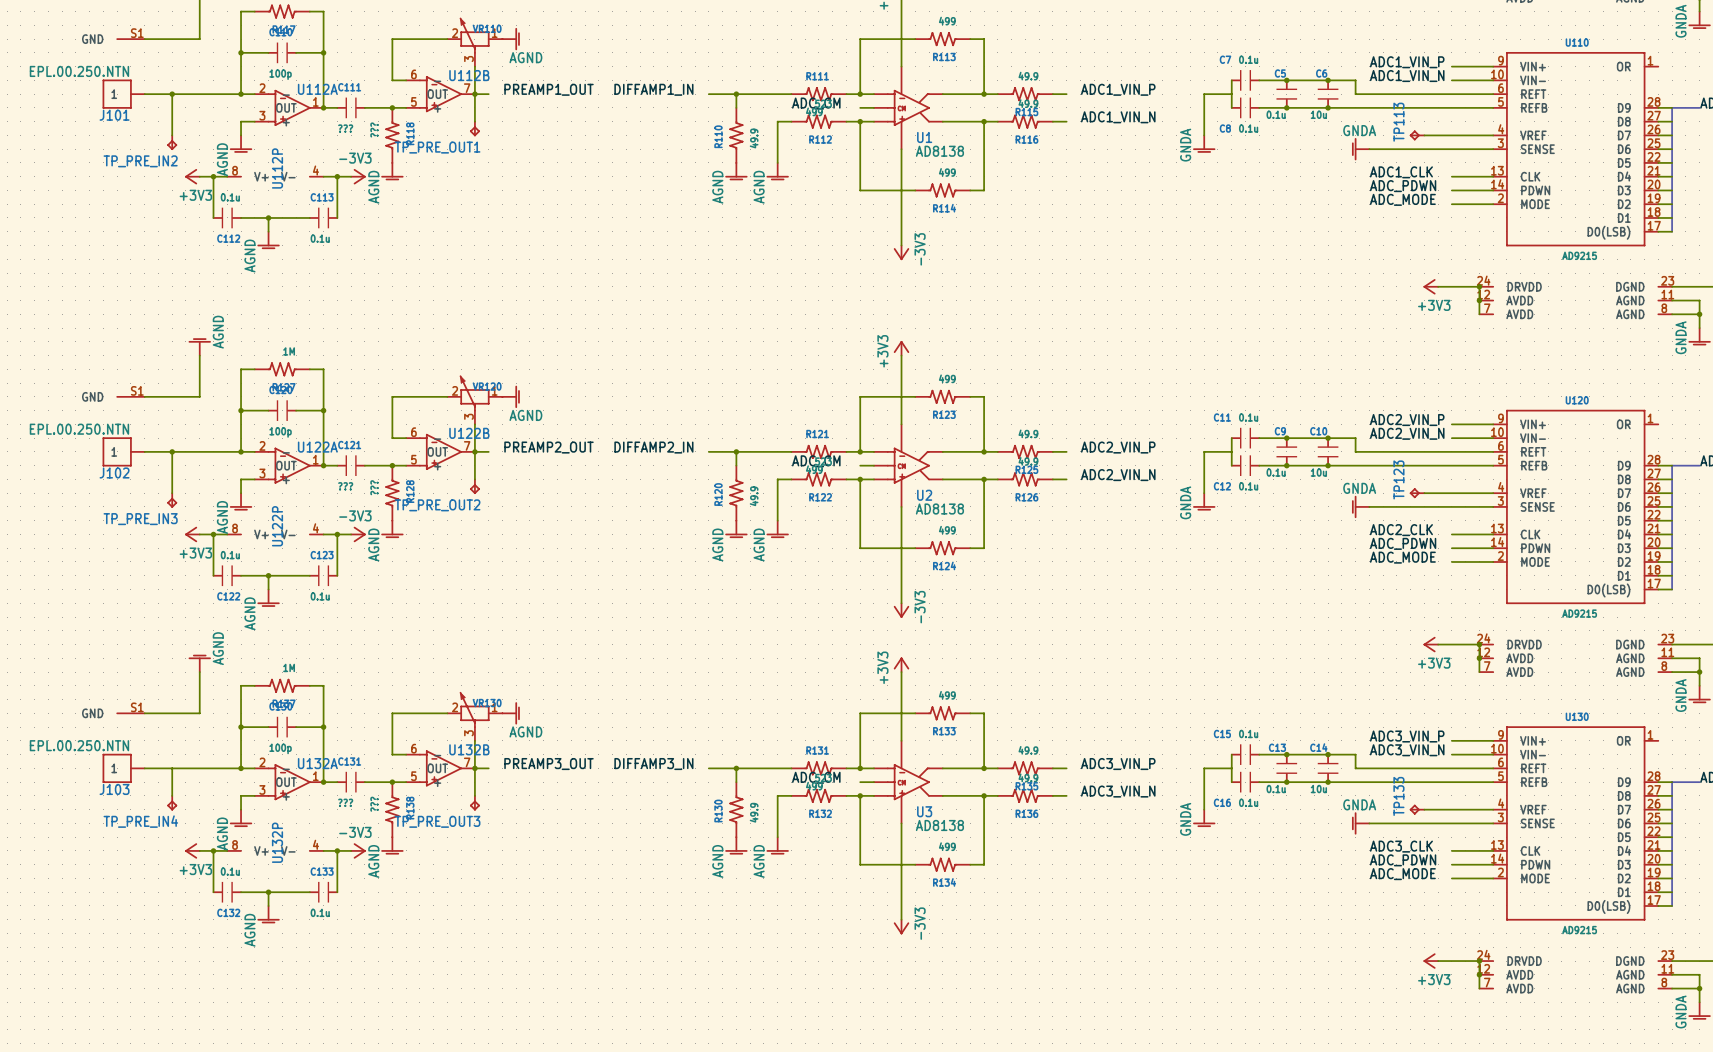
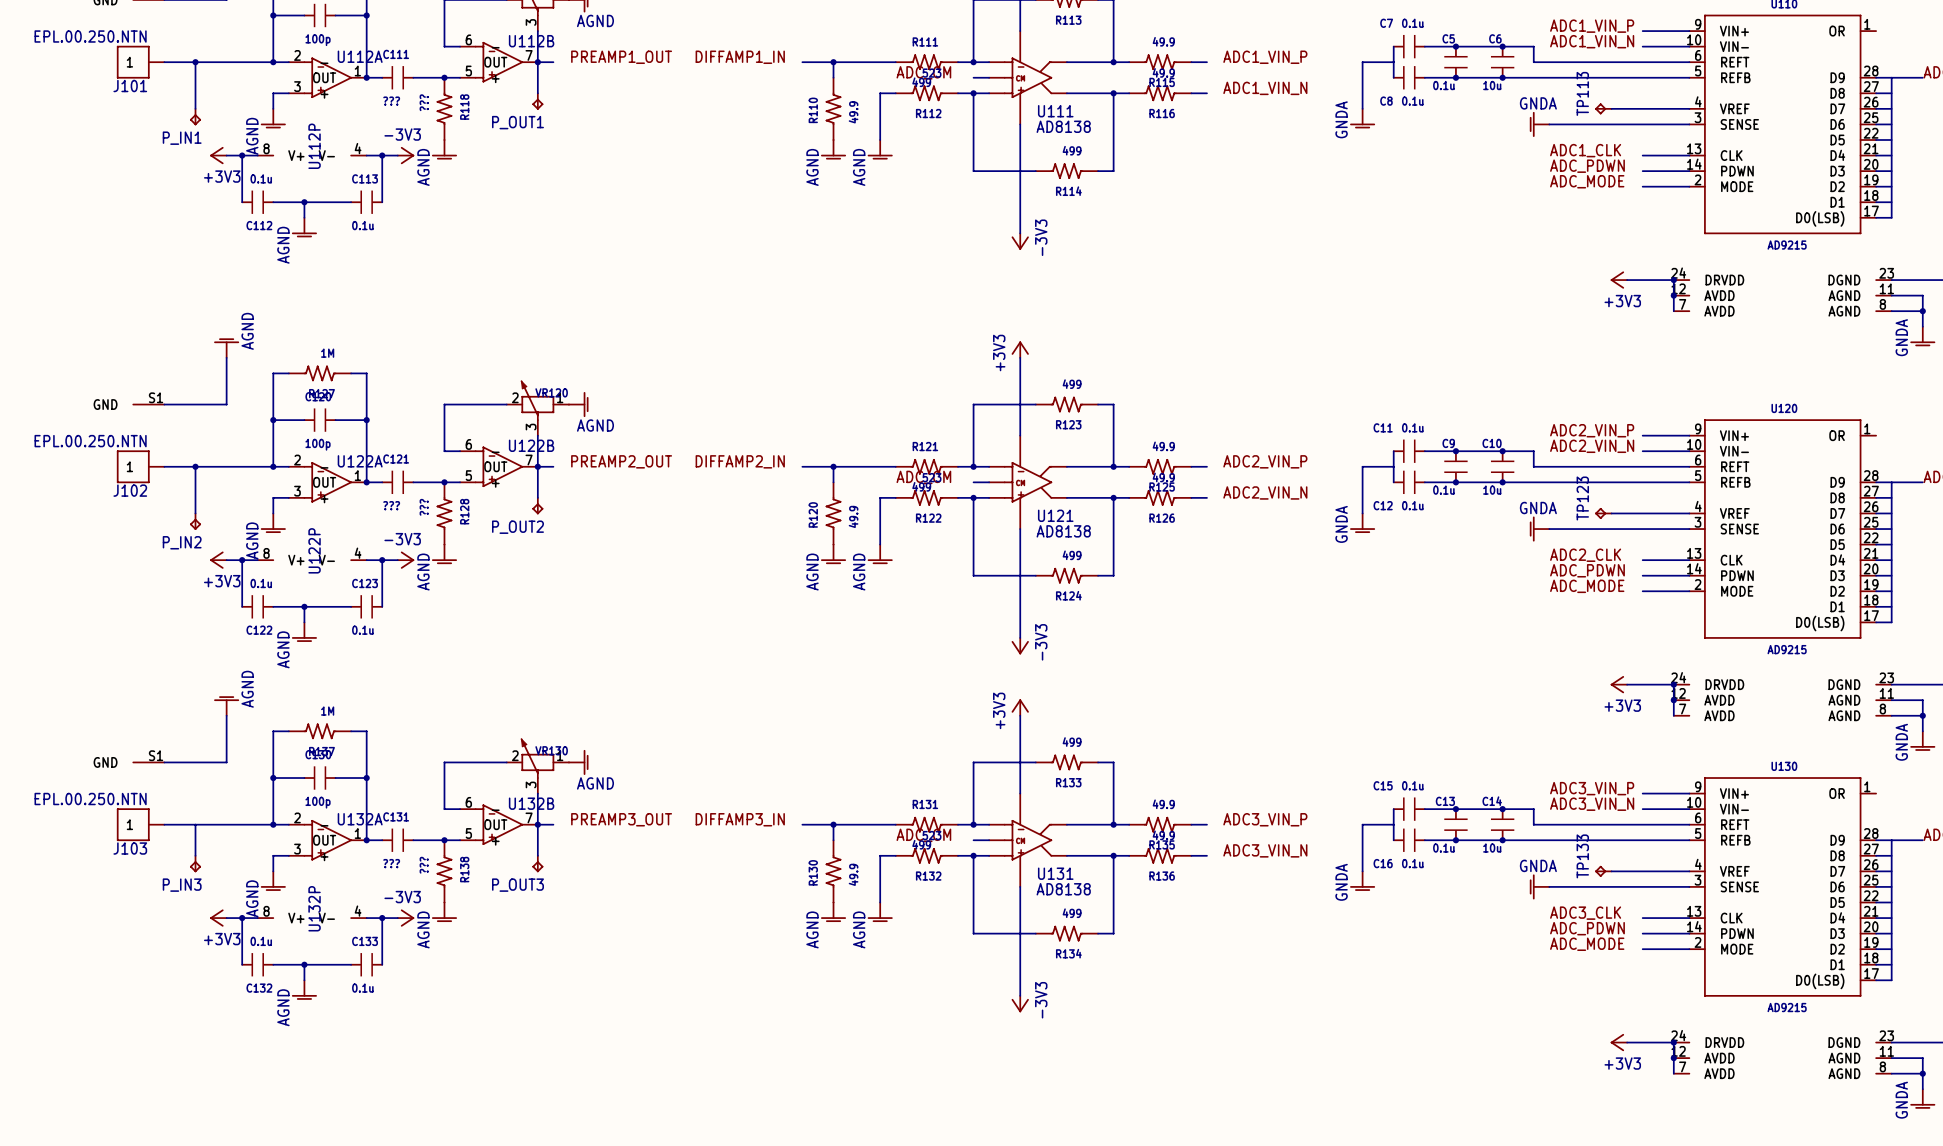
U1 name: U1 (924, 137) -> U111 (1055, 111)
TP_PRE_OUT1 name: TP_PRE_OUT1 (437, 147) -> P_OUT1 (517, 122)
TP_PRE_IN2 name: TP_PRE_IN2 (140, 161) -> P_IN1 (182, 138)
U2 name: U2 (924, 495) -> U121 (1055, 515)
TP_PRE_OUT2 name: TP_PRE_OUT2 (437, 505) -> P_OUT2 (517, 527)
TP_PRE_IN3 name: TP_PRE_IN3 (140, 519) -> P_IN2 (182, 542)
U3 name: U3 (924, 811) -> U131 (1055, 873)
TP_PRE_IN4 name: TP_PRE_IN4 (140, 821) -> P_IN3 (182, 885)
TP_PRE_OUT3 name: TP_PRE_OUT3 (437, 821) -> P_OUT3 (517, 885)

